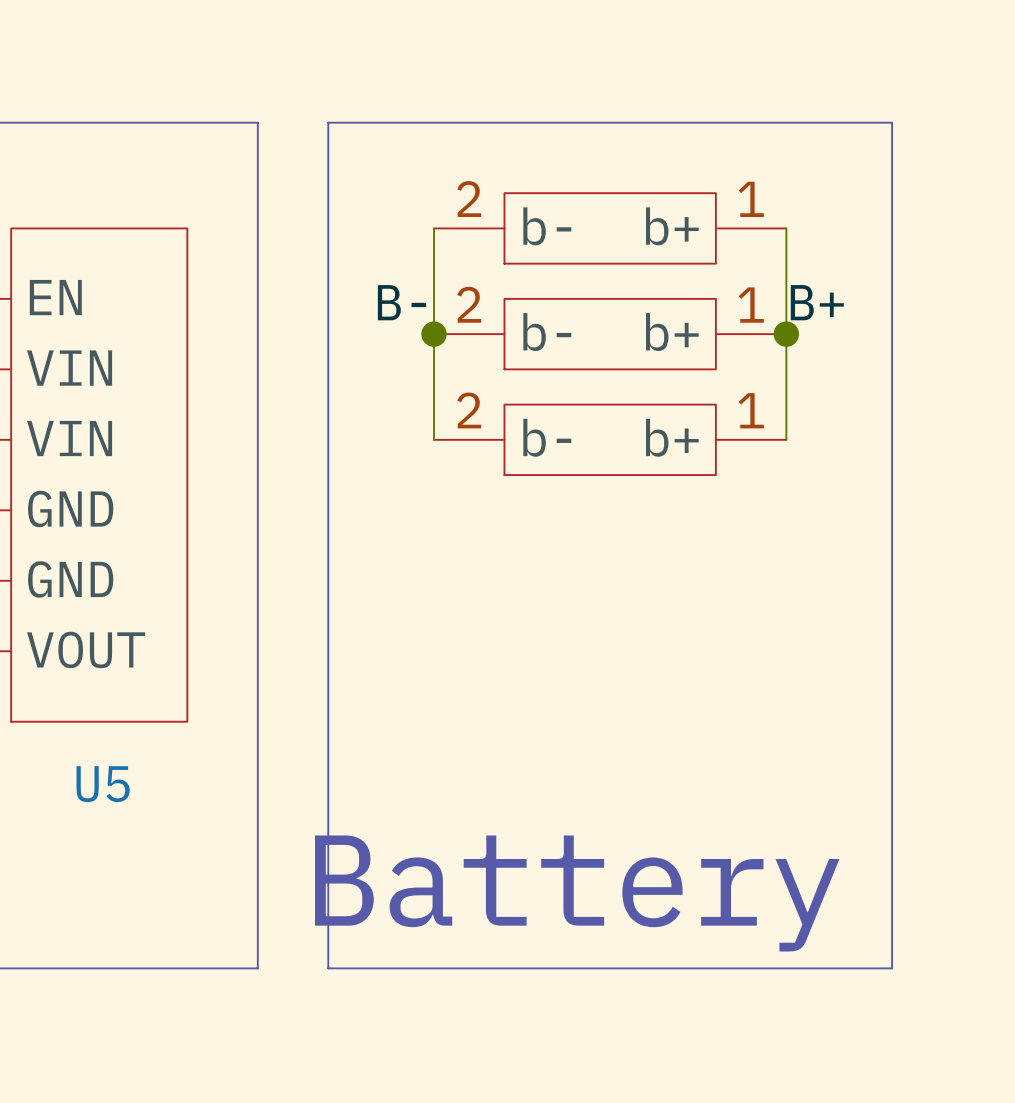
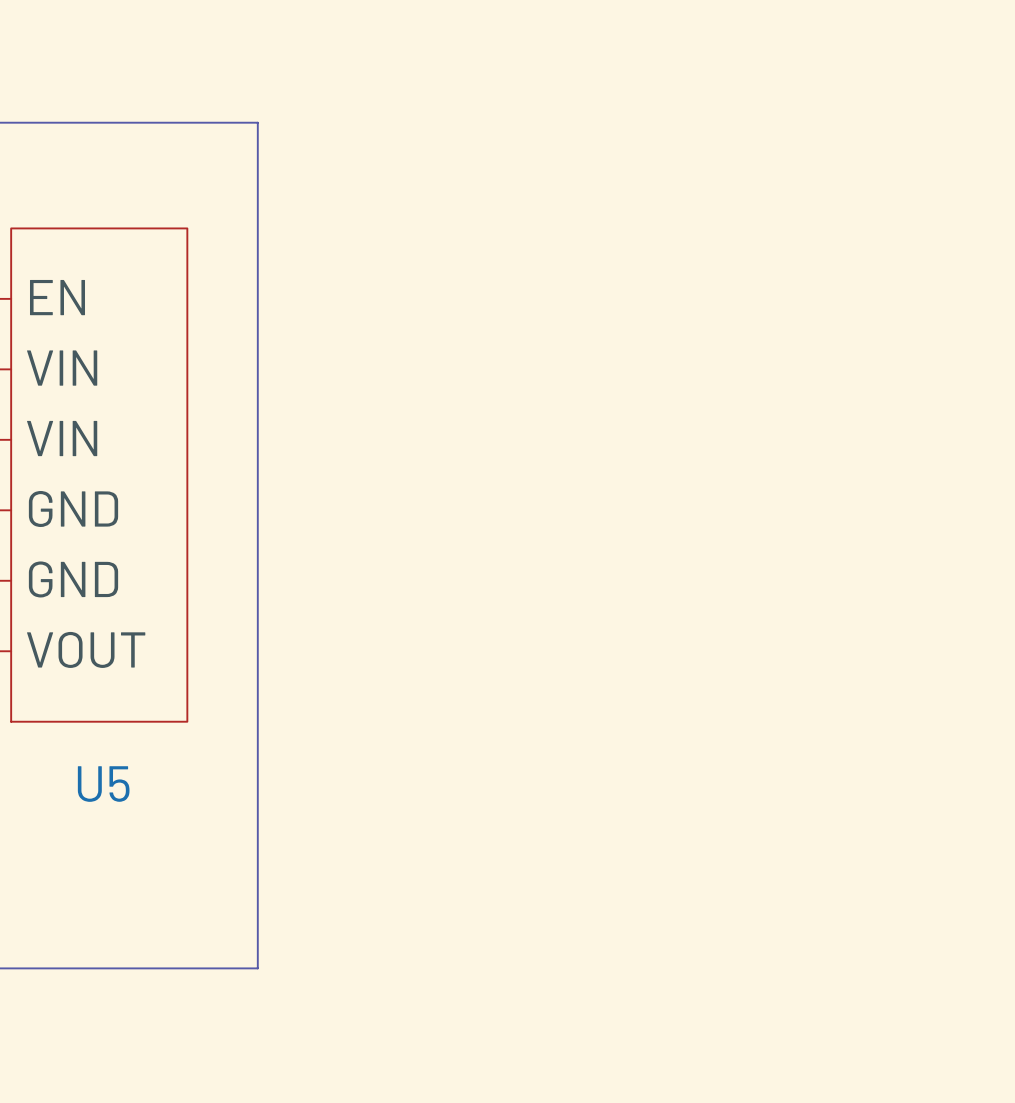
line: (328, 122) (892, 122) (892, 968) (328, 968) (328, 122) -> none
wire: (433, 228) (433, 439) -> none
part: (610, 228) -> none
wire: (786, 228) (786, 439) -> none
label: B- (402, 302) -> none
label: B+ (817, 302) -> none
junction: (433, 334) -> none
part: (610, 334) -> none
junction: (786, 334) -> none
part: (610, 439) -> none
text: Battery (577, 893) -> none

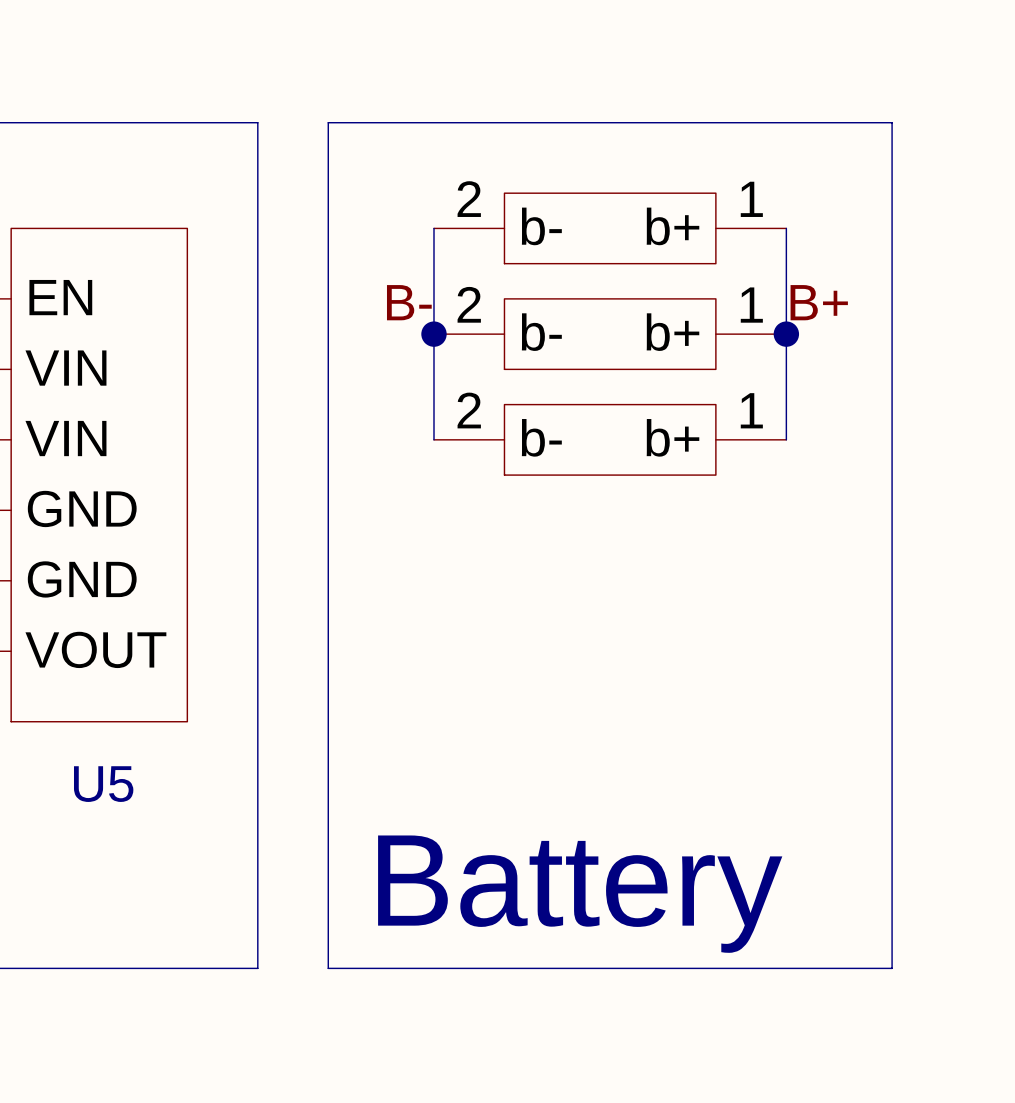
line: none -> (328, 122) (892, 122) (892, 968) (328, 968) (328, 122)
wire: none -> (433, 228) (433, 439)
part: none -> (610, 228)
wire: none -> (786, 228) (786, 439)
label: none -> B- (409, 302)
label: none -> B+ (819, 302)
junction: none -> (433, 334)
part: none -> (610, 334)
junction: none -> (786, 334)
part: none -> (610, 439)
text: none -> Battery (580, 894)

